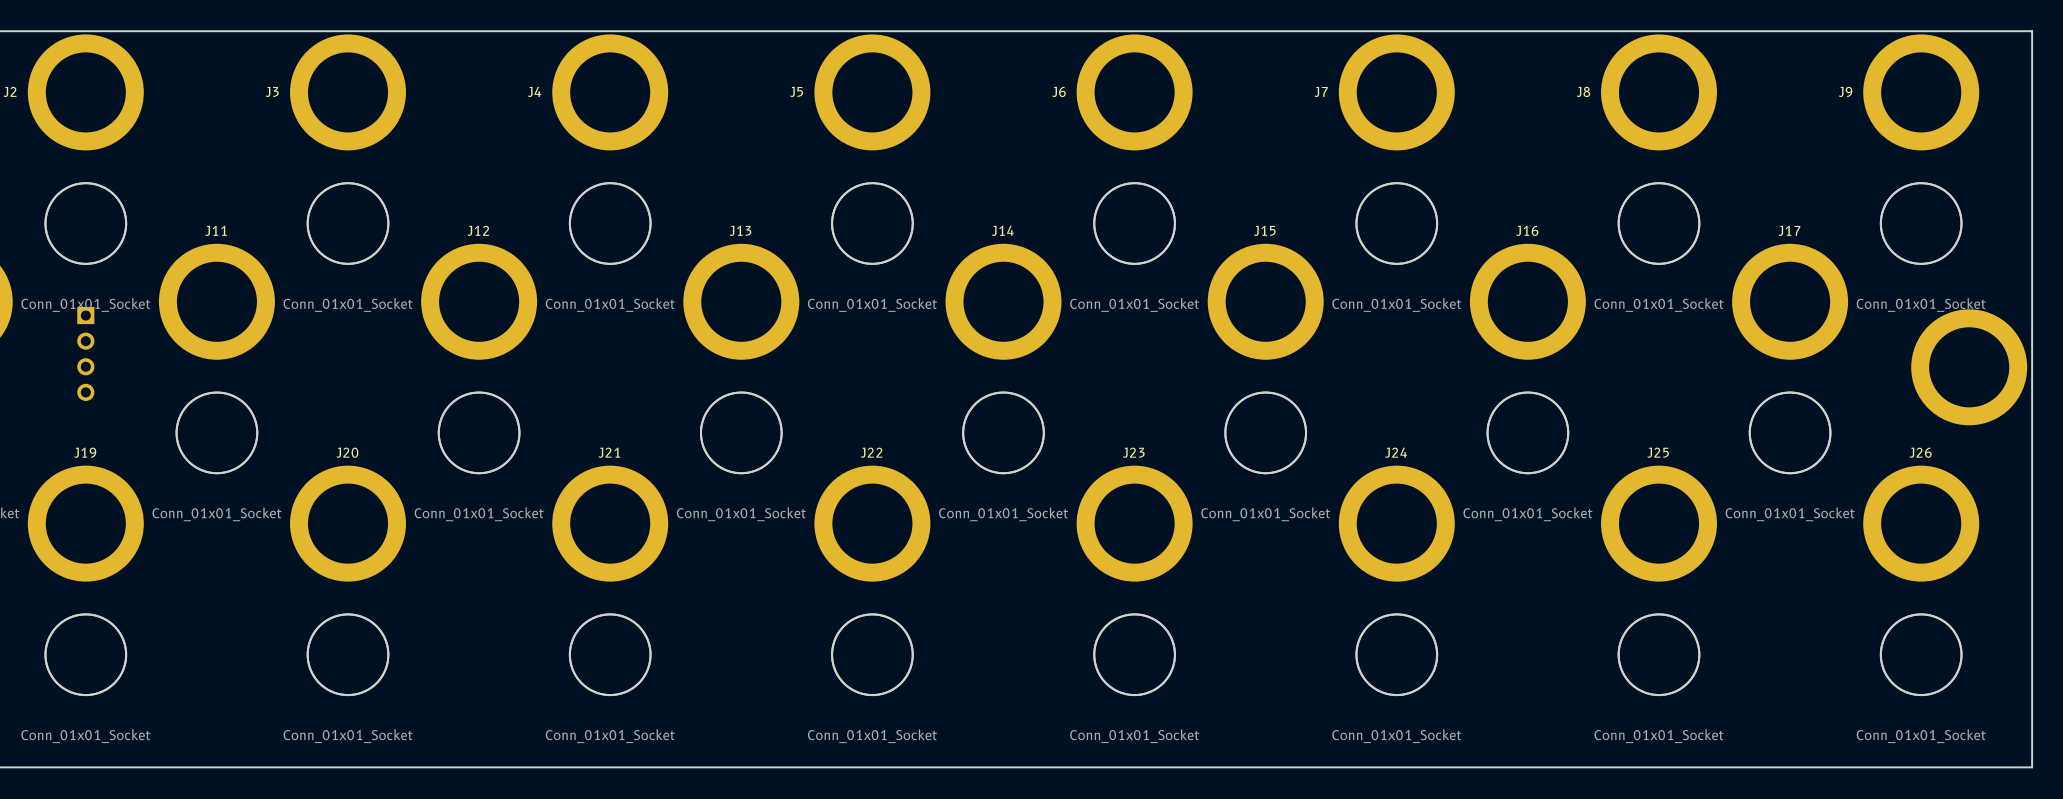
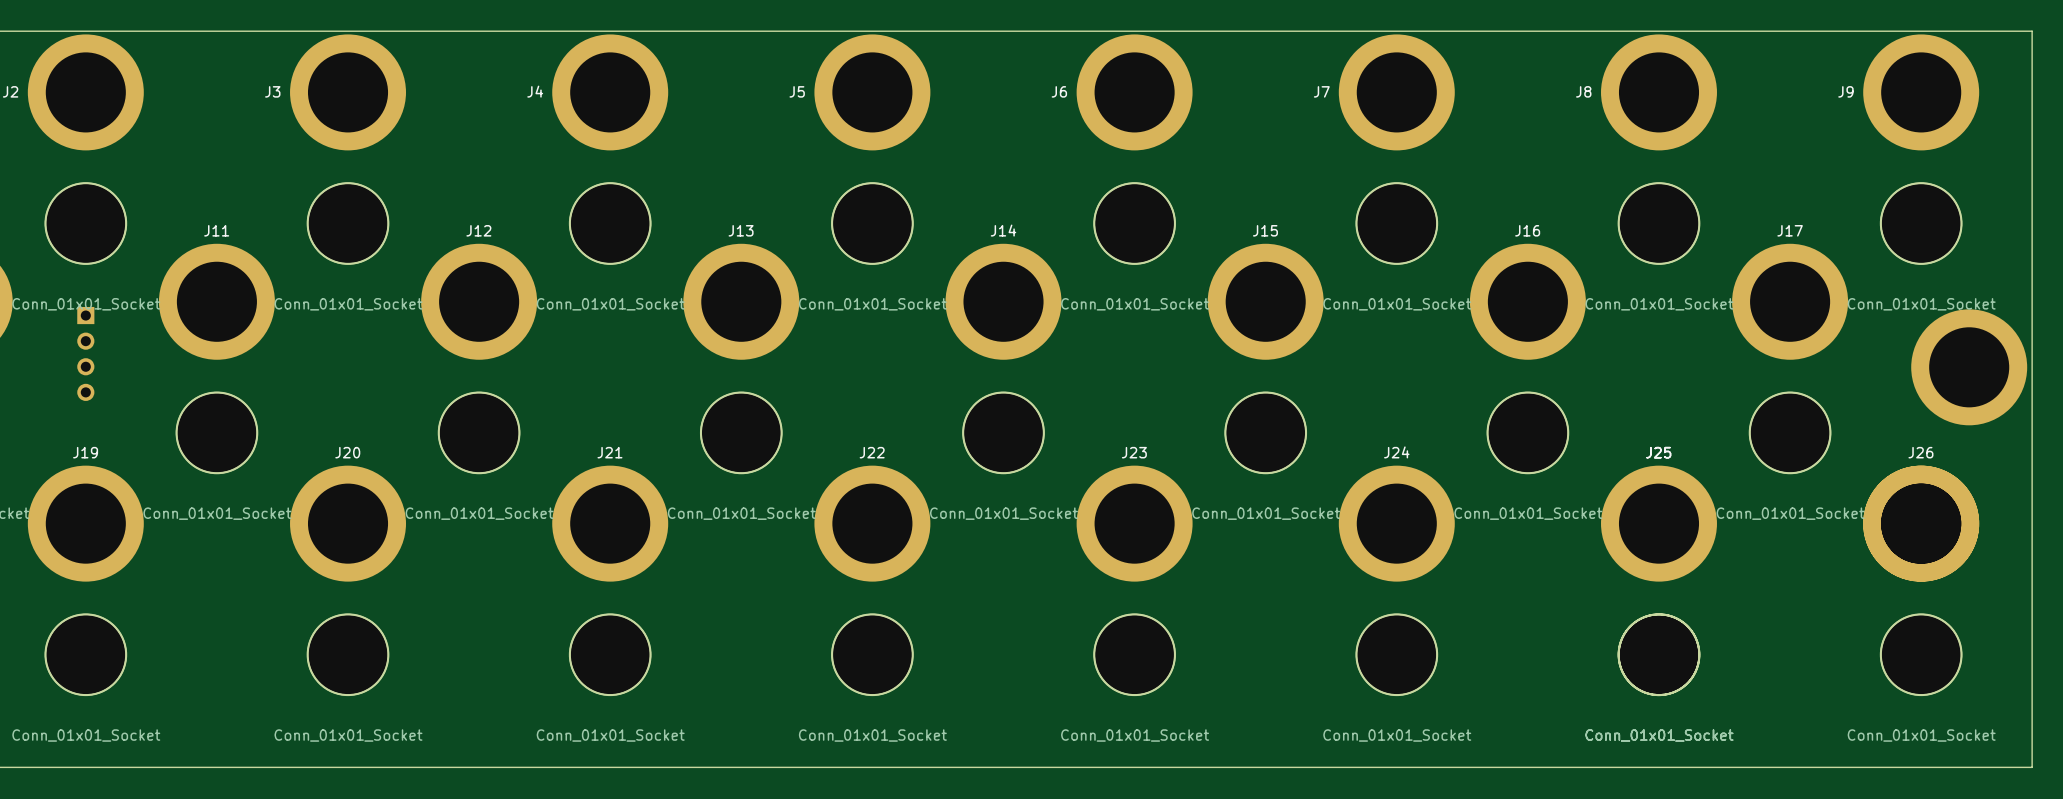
J25: none -> Conn_01x01_Socket (1798, 580)

